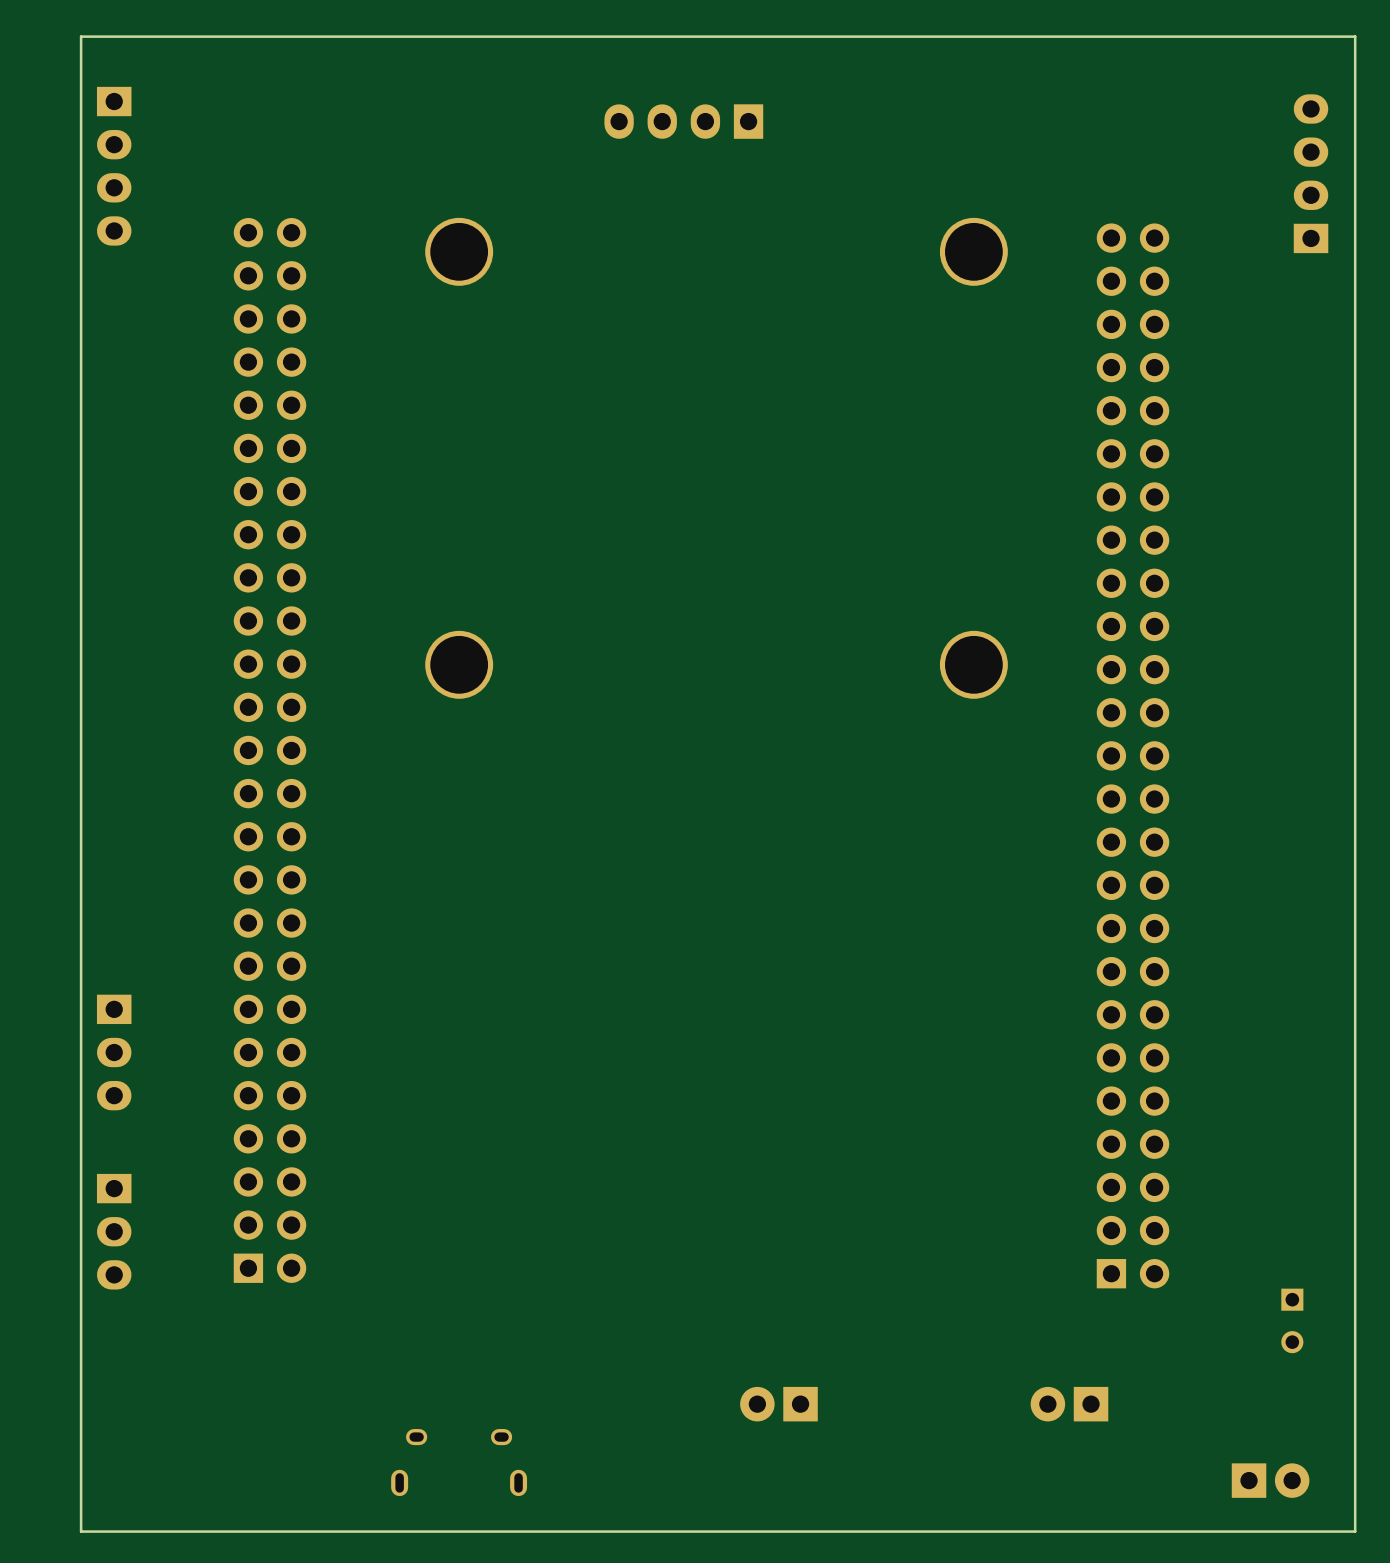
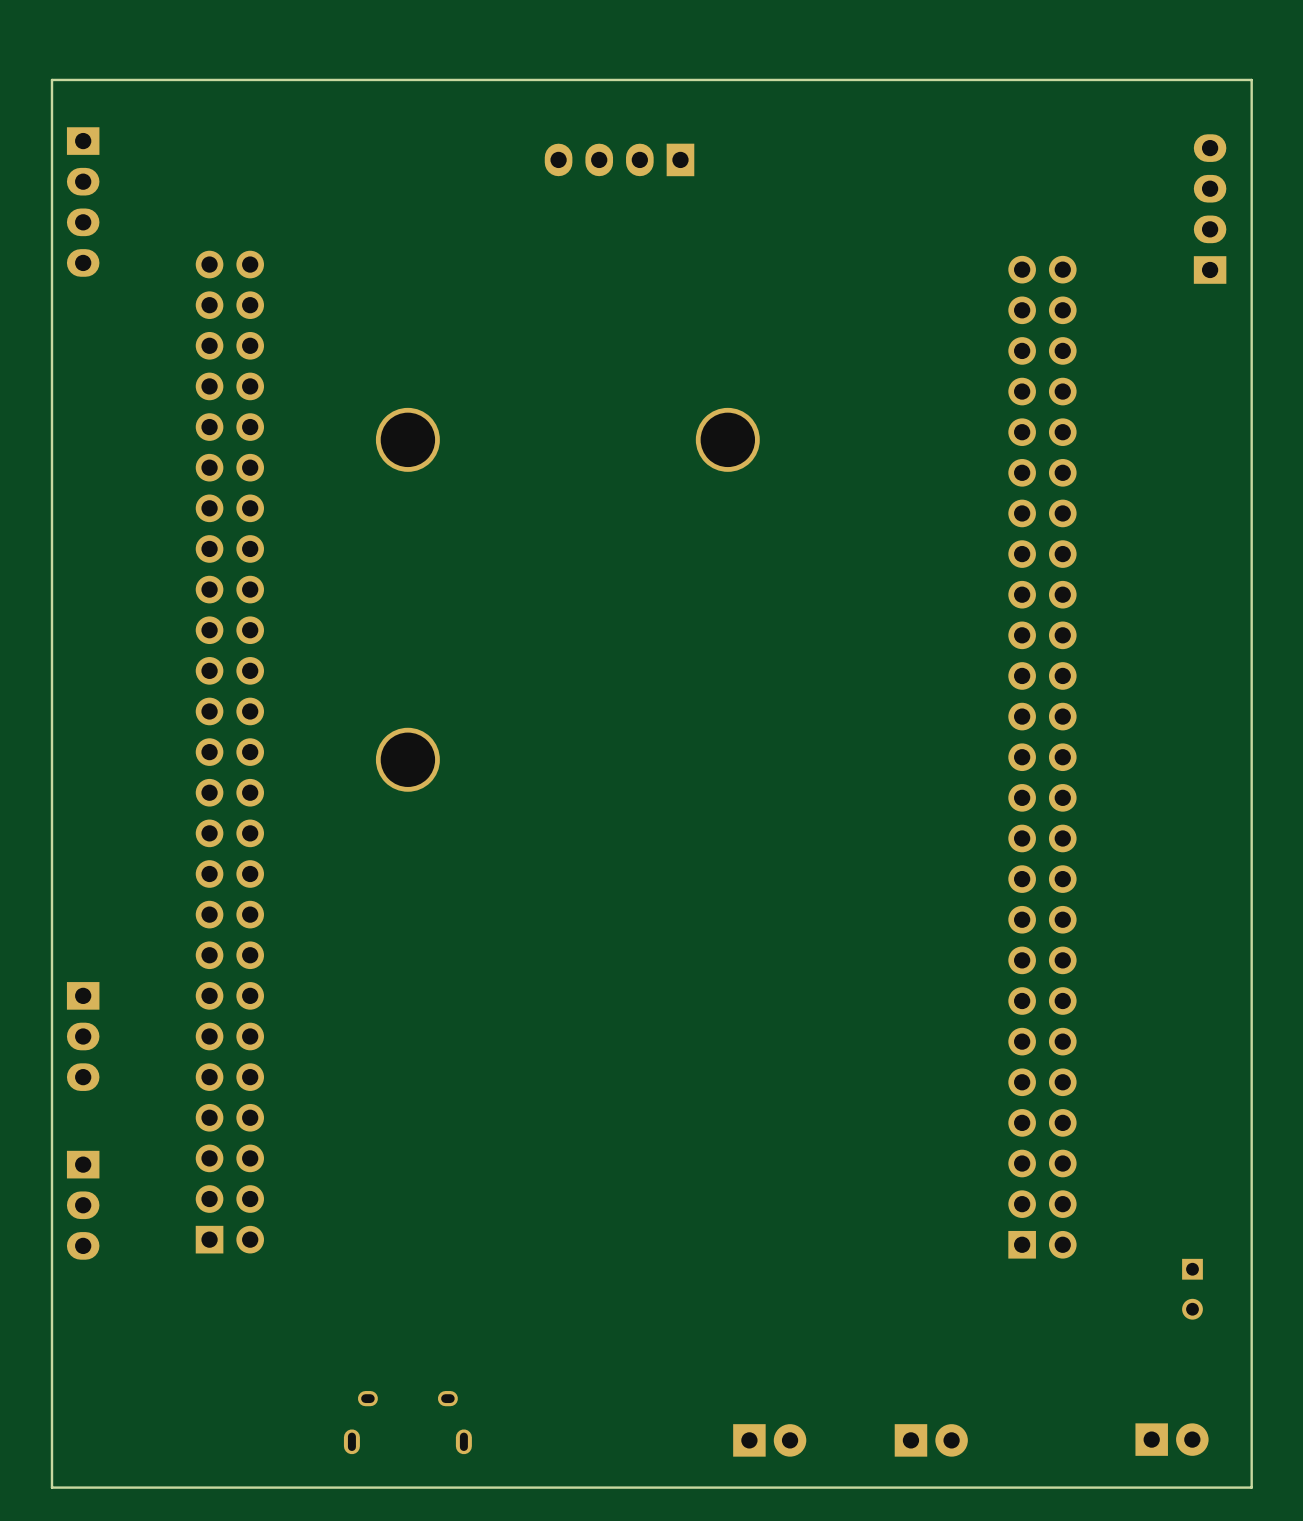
part: (459, 251) -> none
part: (973, 251) -> none
part: none -> (407, 439)
part: none -> (727, 439)
part position: (459, 664) -> (407, 759)
part: (973, 664) -> none
part rotation: 0° (778, 1404) -> 180° (769, 1440)
part position: (778, 1404) -> (769, 1440)
part rotation: 0° (1069, 1404) -> 180° (931, 1440)
part position: (1069, 1404) -> (931, 1440)

